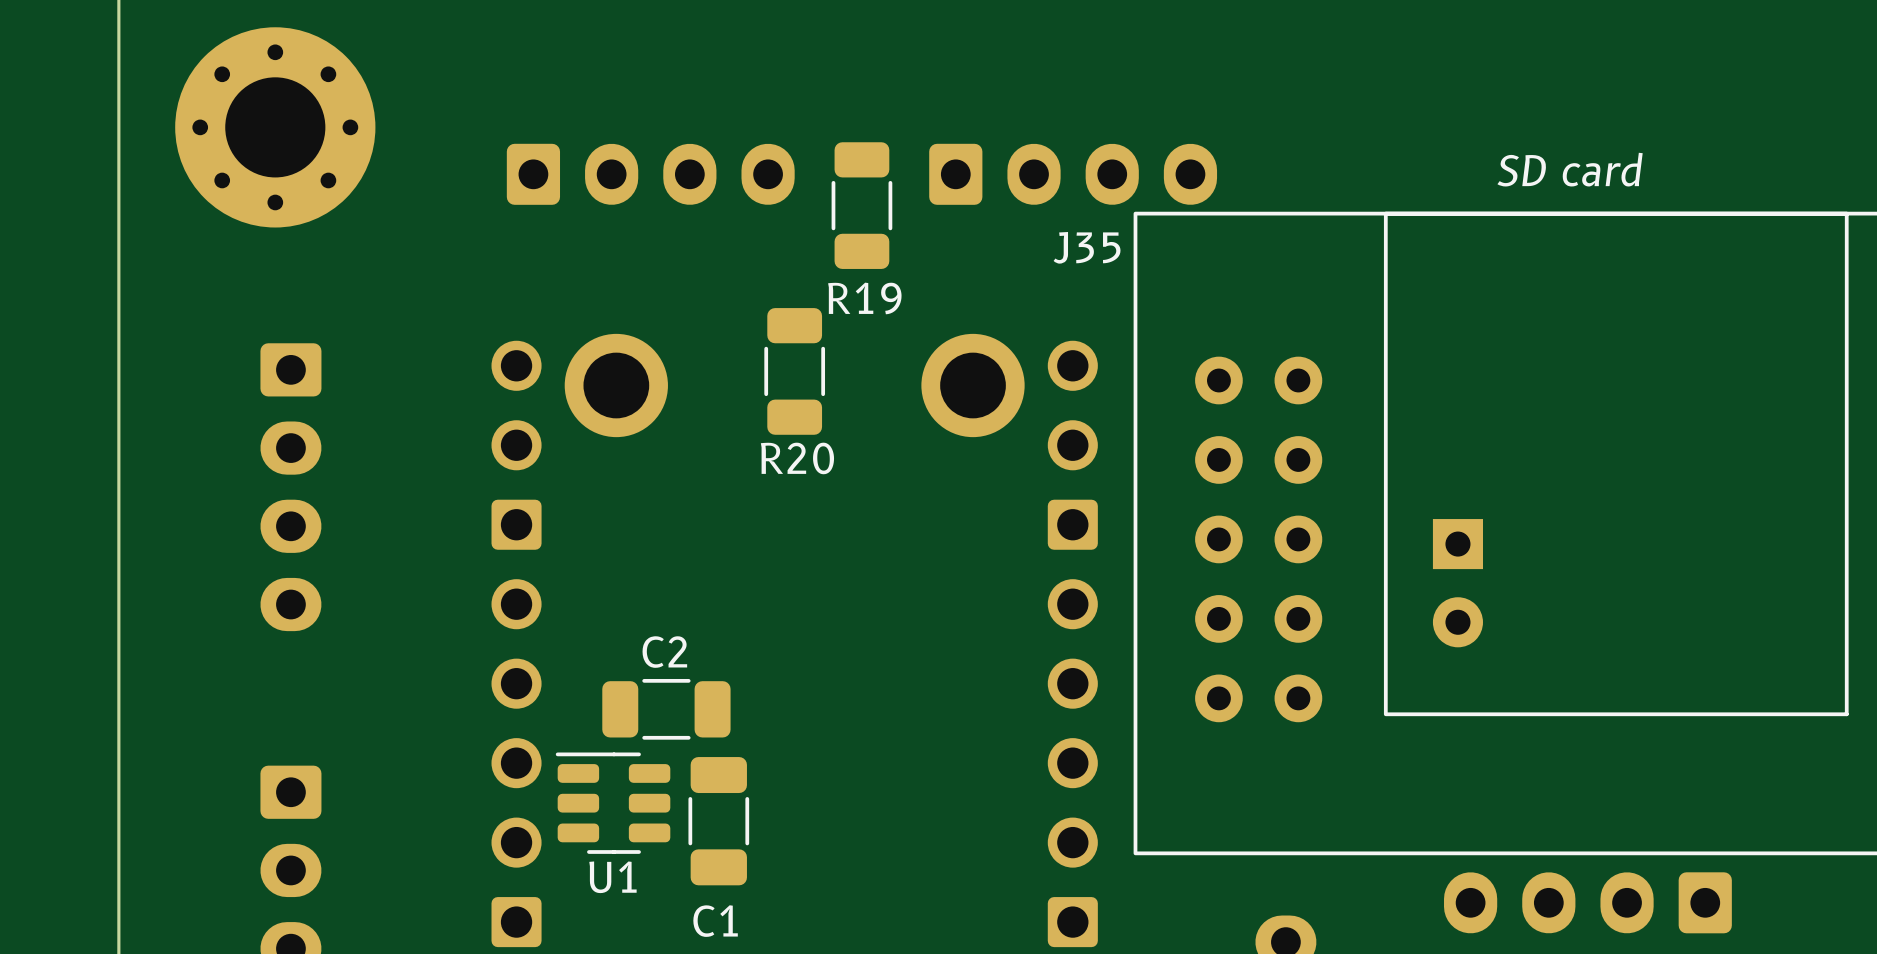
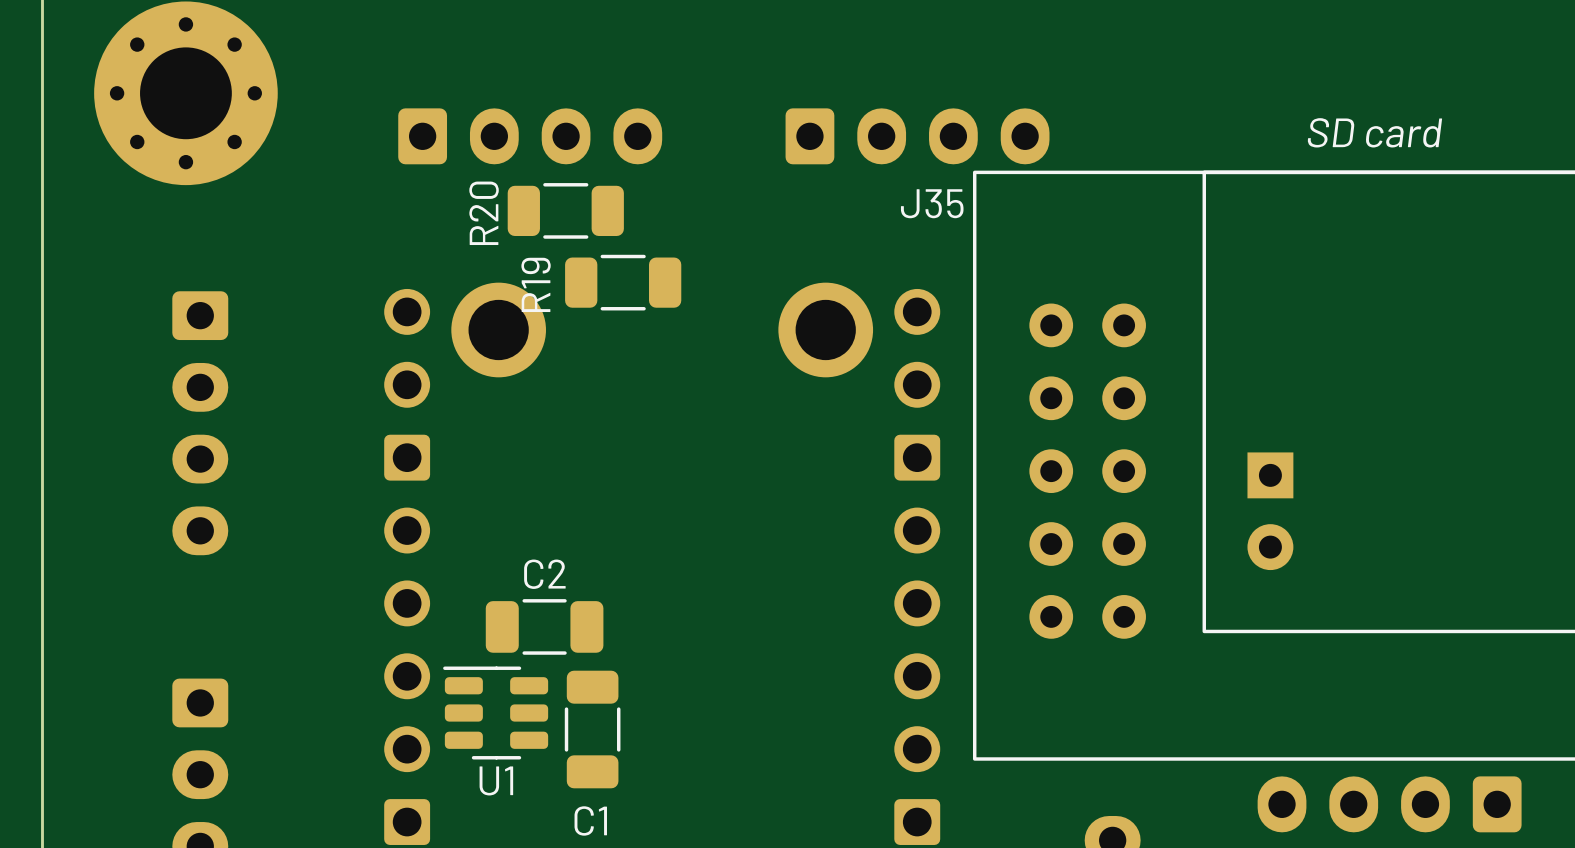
R19 rotation: 0° (861, 205) -> 90° clockwise (623, 282)
R19 position: (861, 205) -> (623, 282)
R20 rotation: 0° (794, 371) -> 90° clockwise (565, 210)
R20 position: (794, 371) -> (565, 210)

